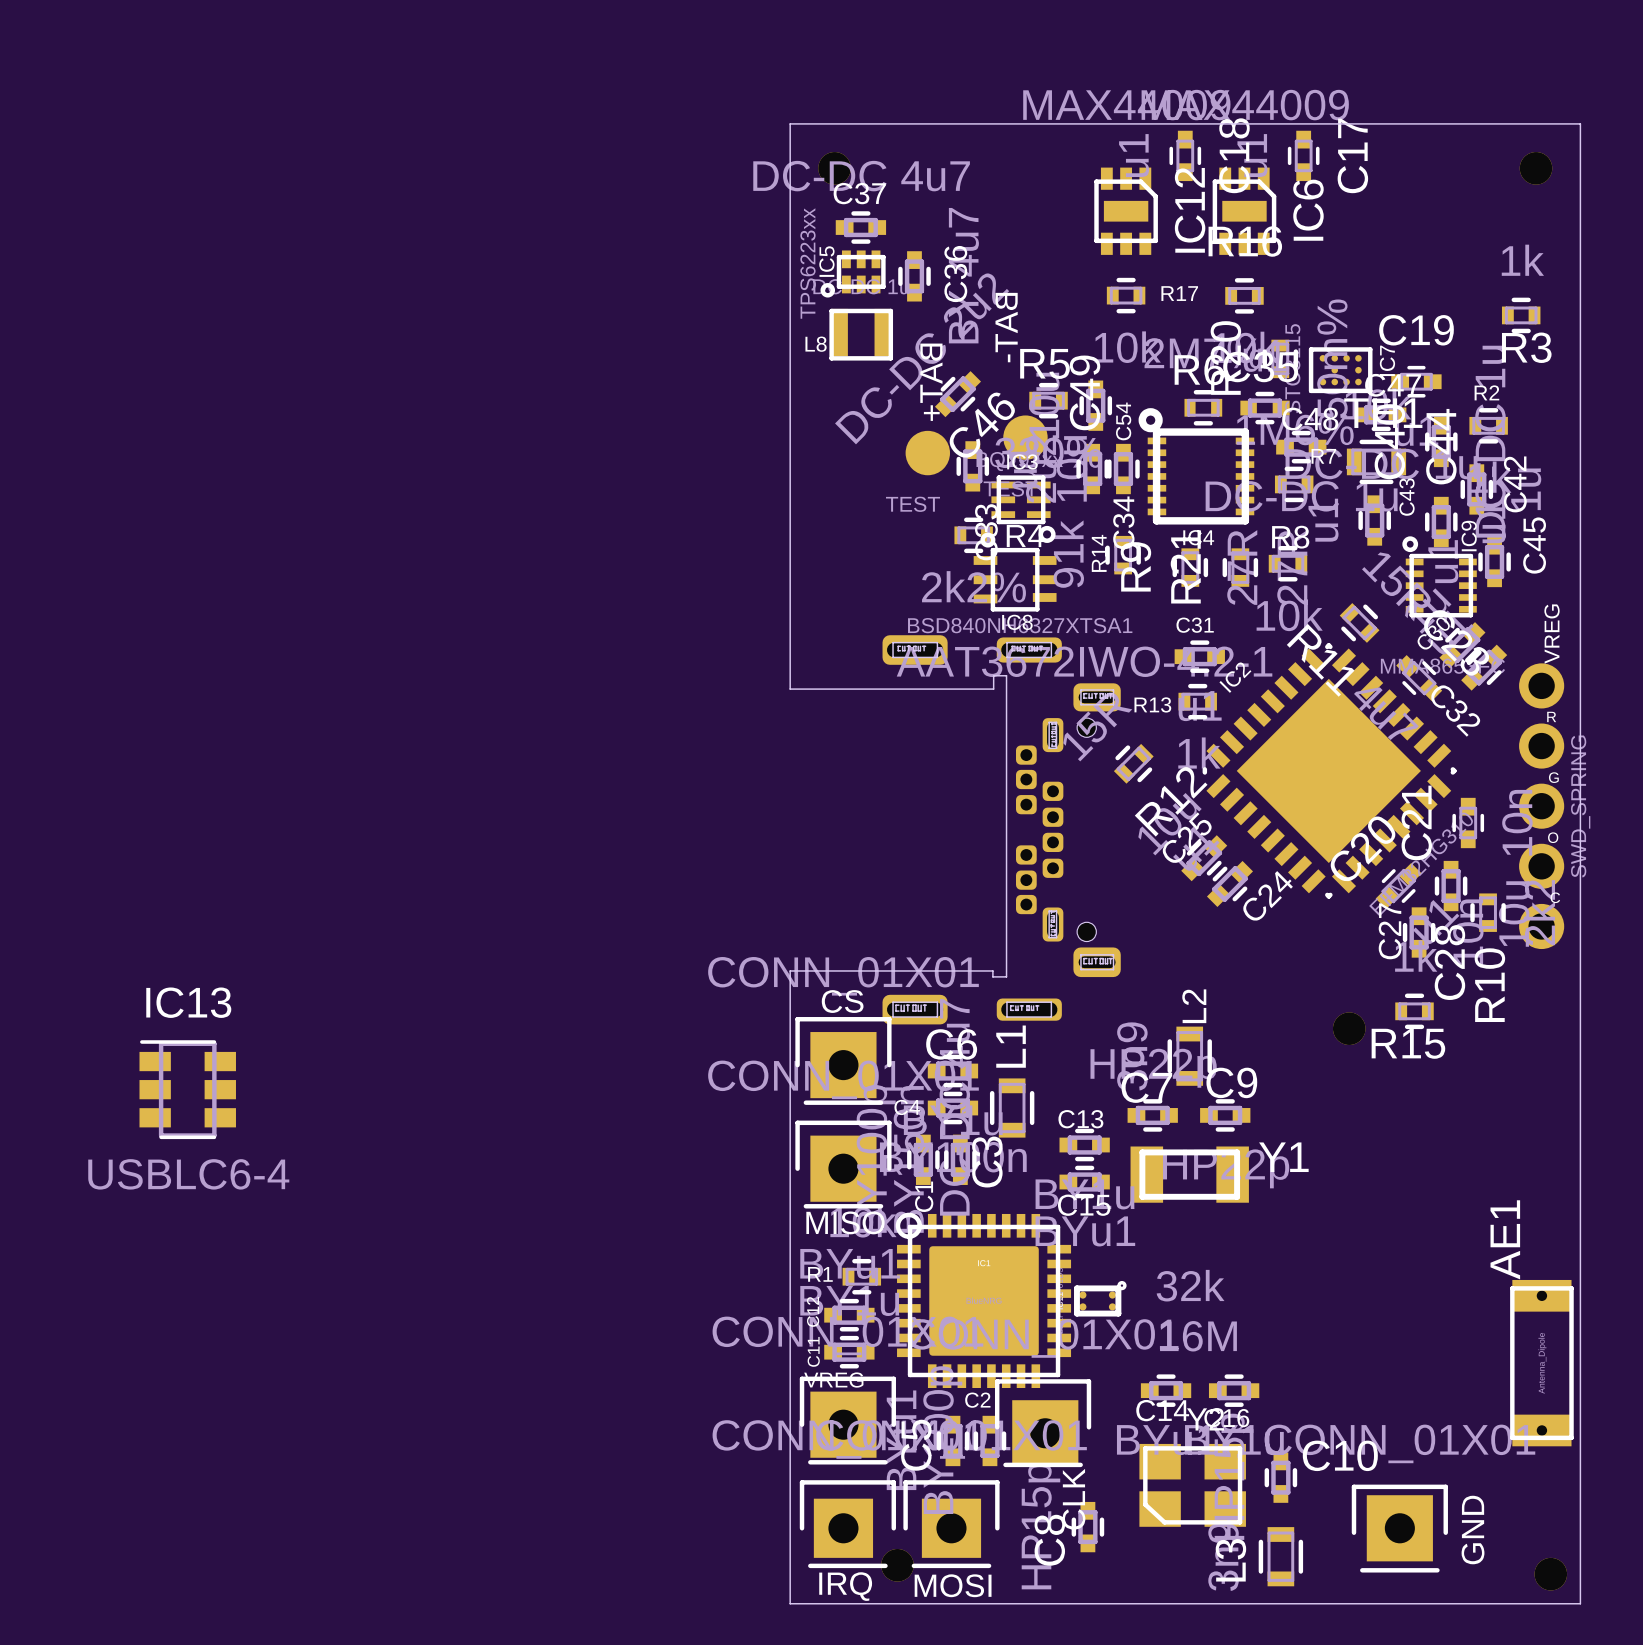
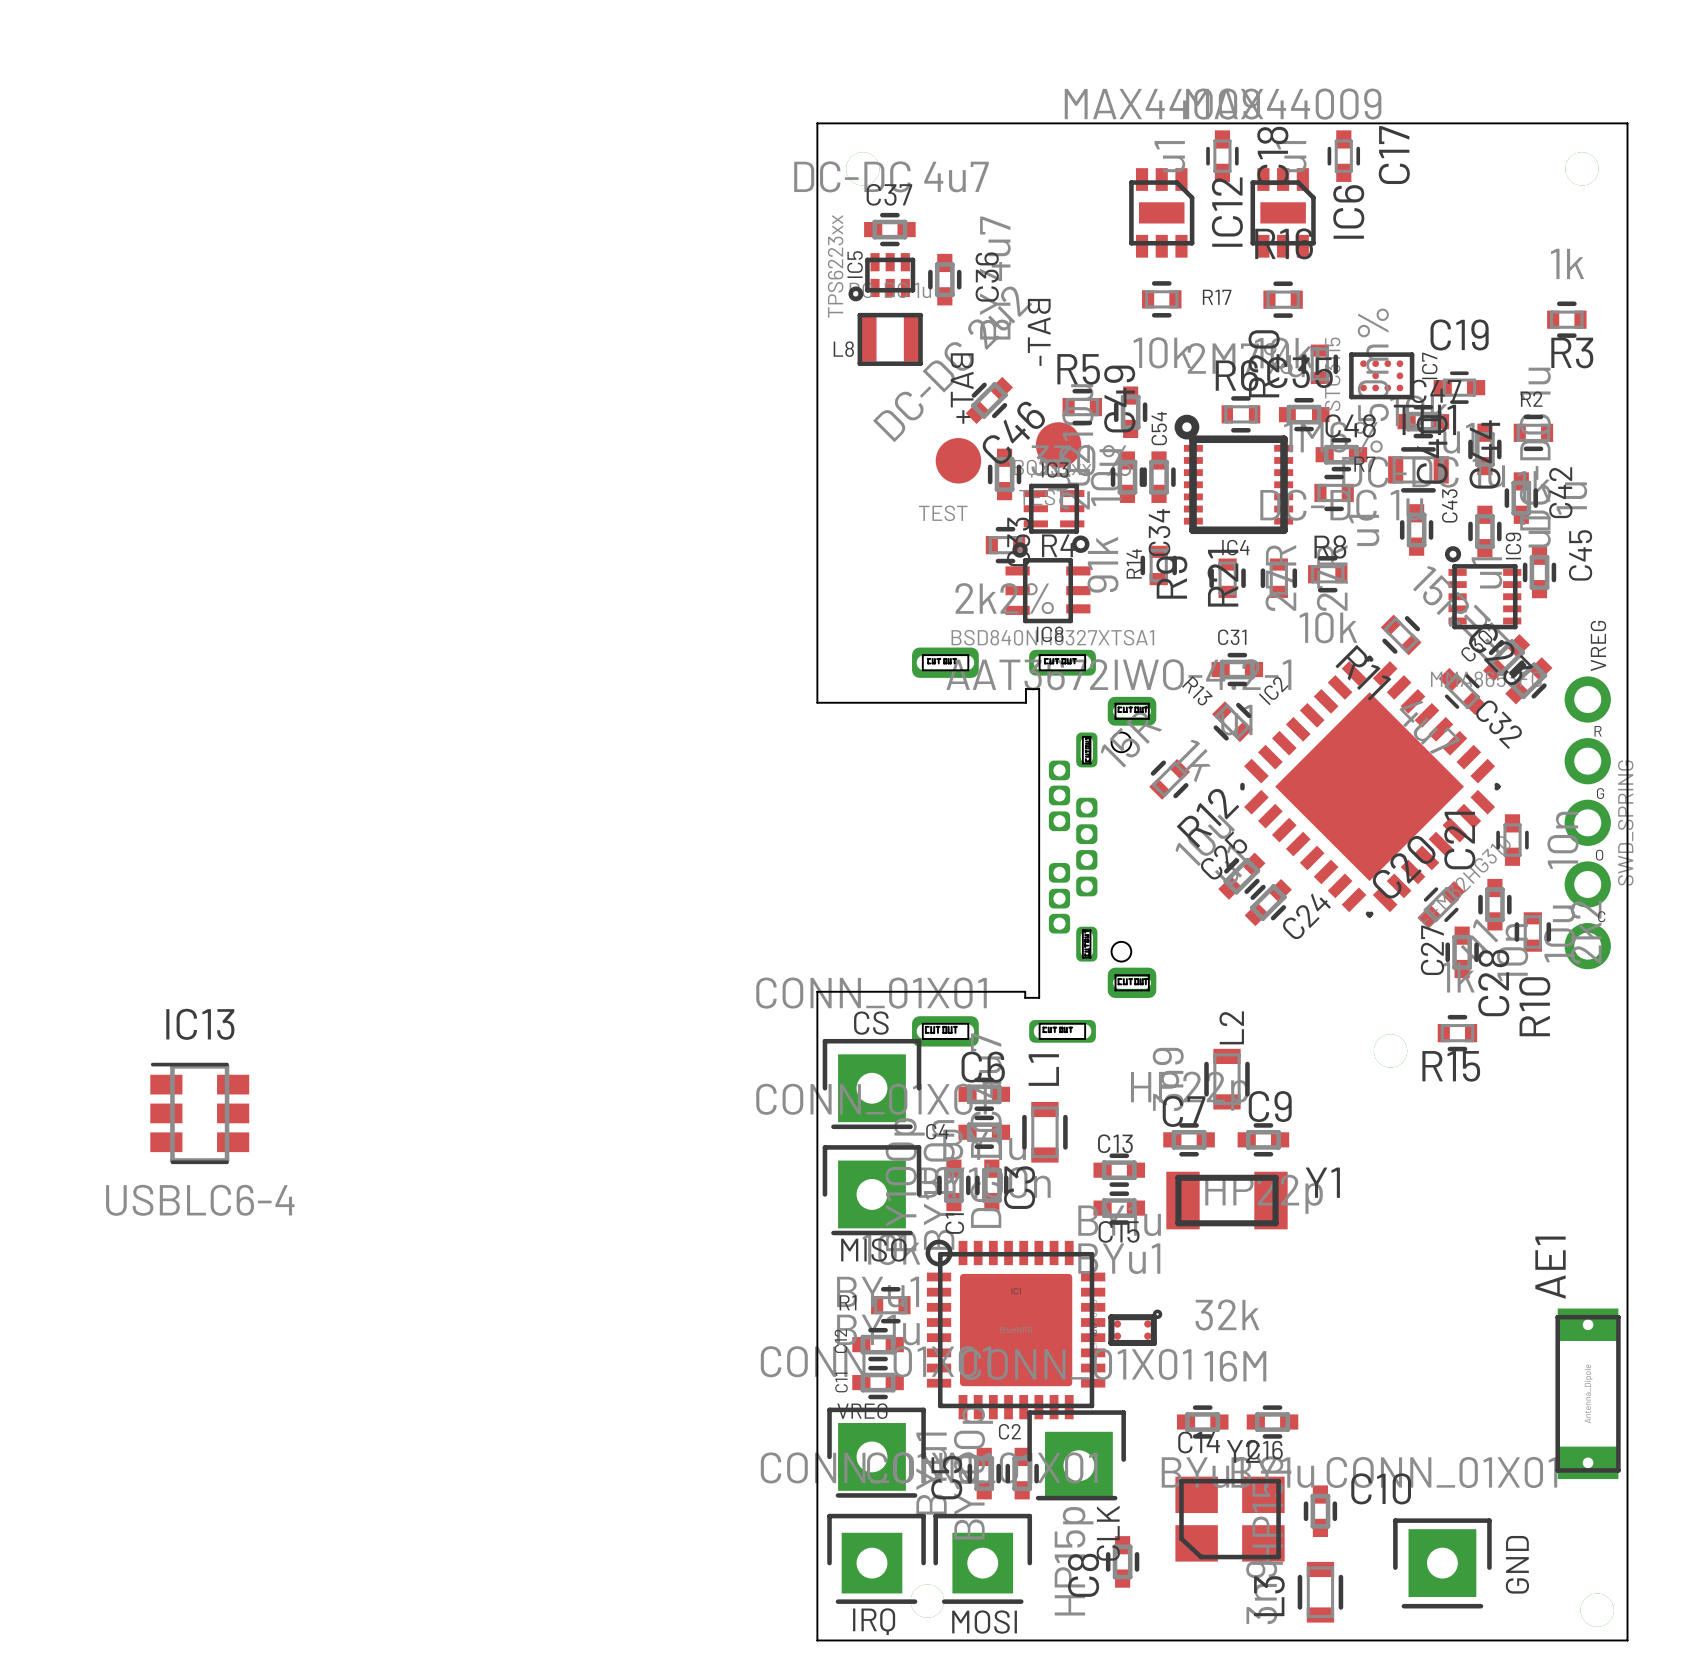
R13 rotation: 0° (1197, 701) -> 45° clockwise (1232, 721)

